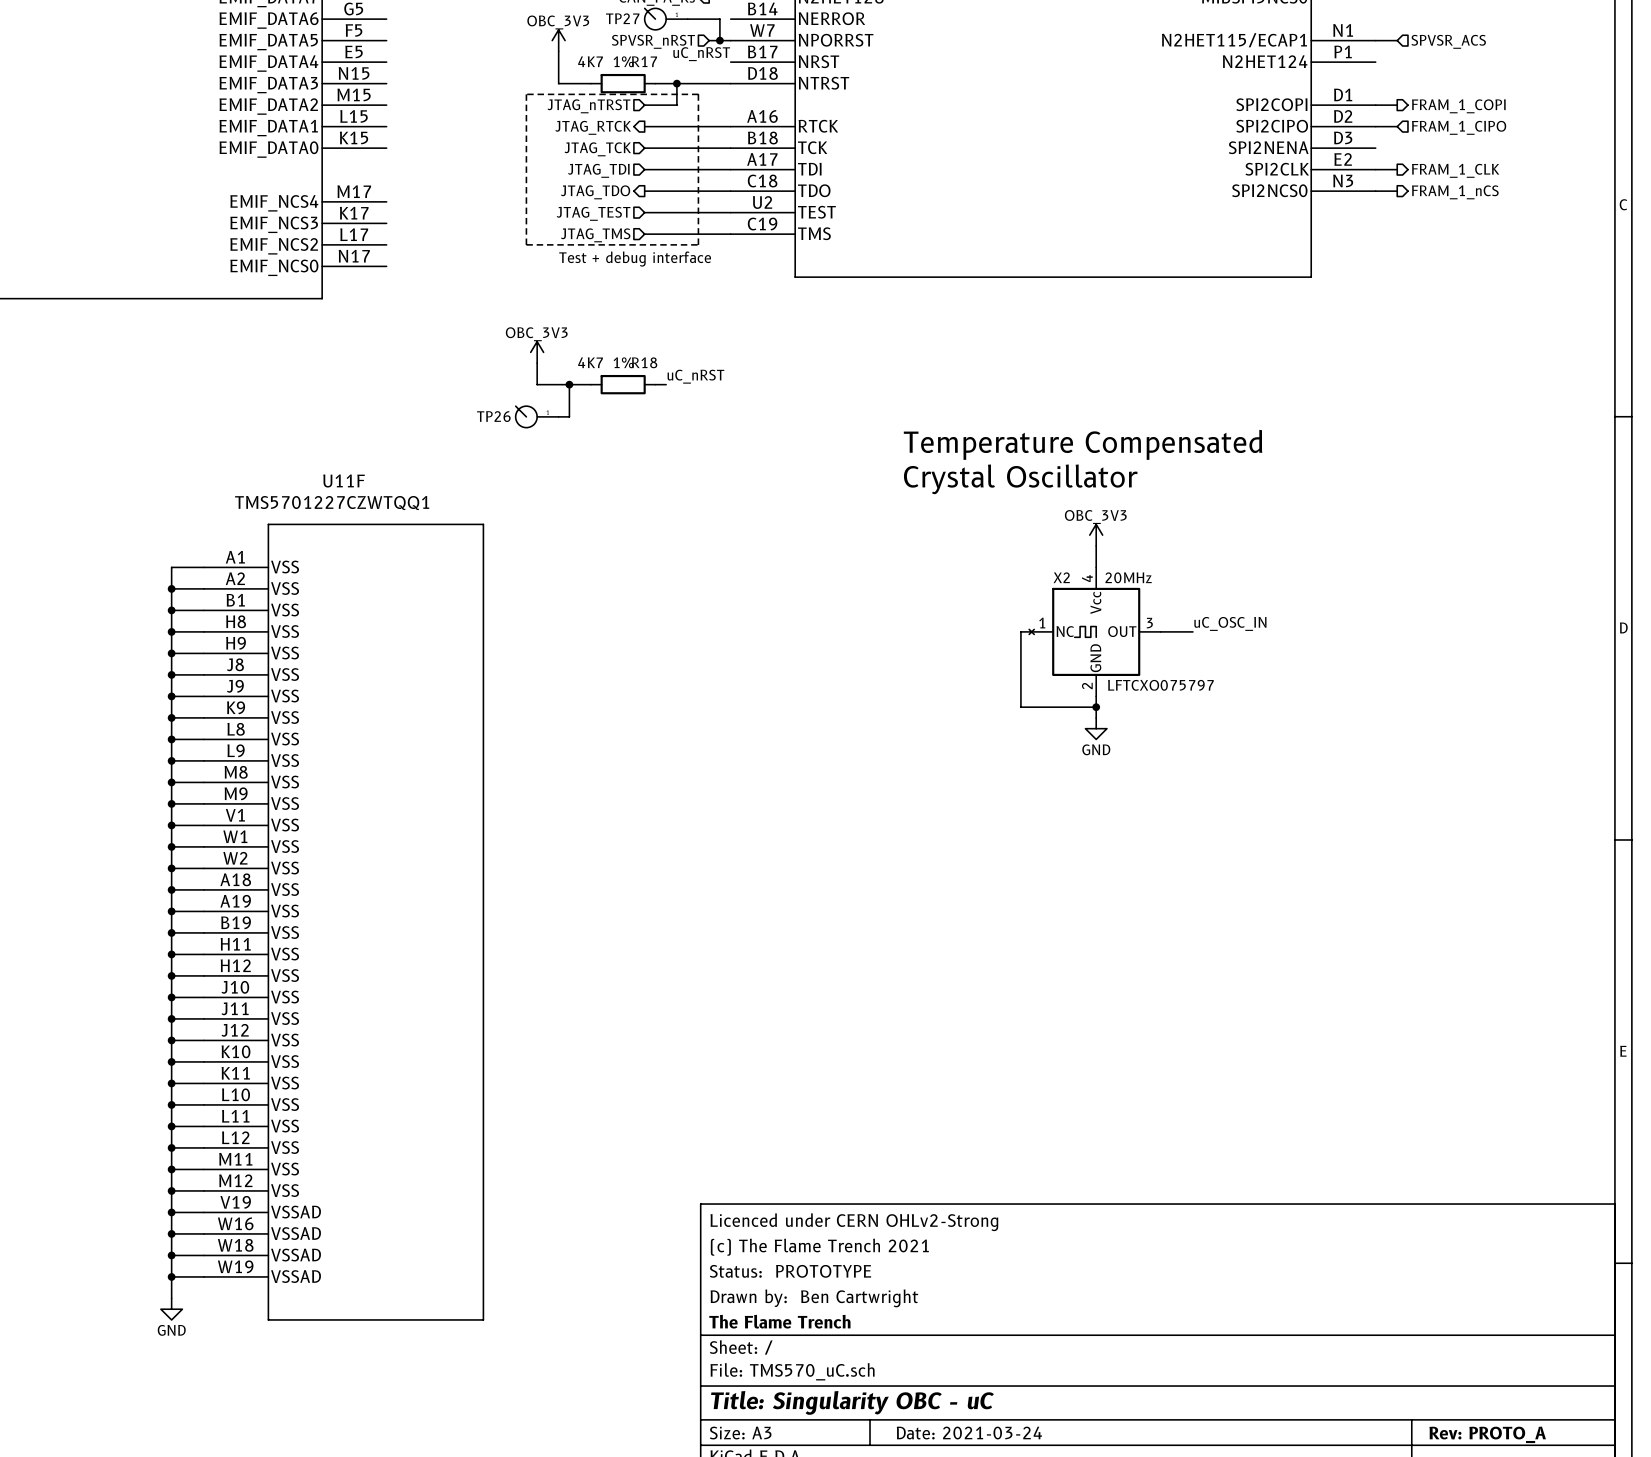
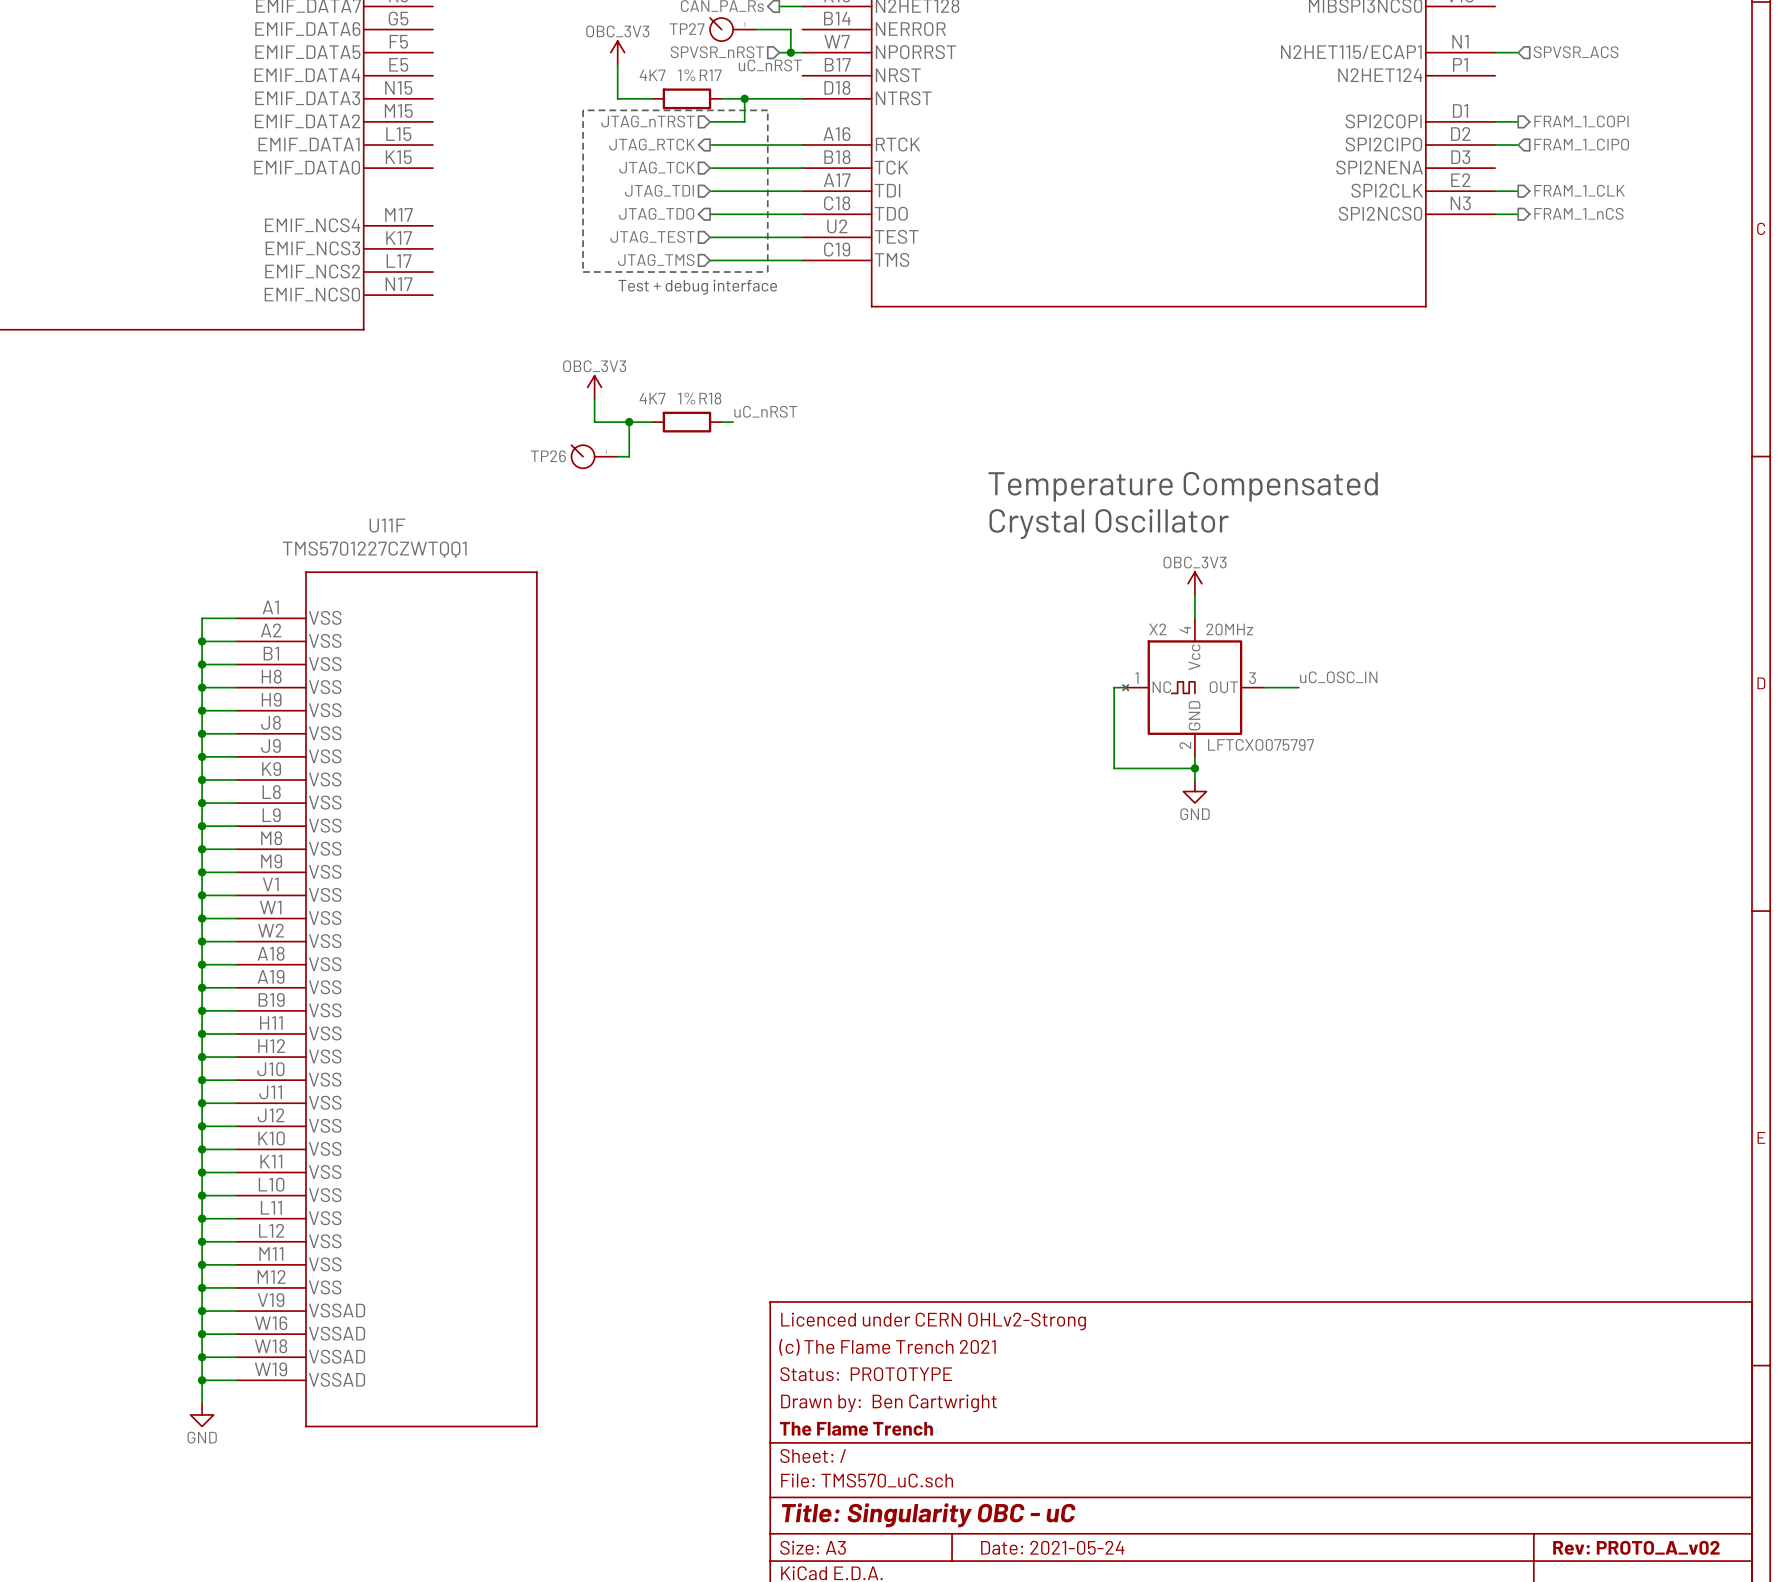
title block: Date: 2021-03-24 (969, 1433) -> Date: 2021-05-24 (1052, 1547)
title block: Rev: PROTO_A (1487, 1434) -> Rev: PROTO_A_v02 (1636, 1547)

